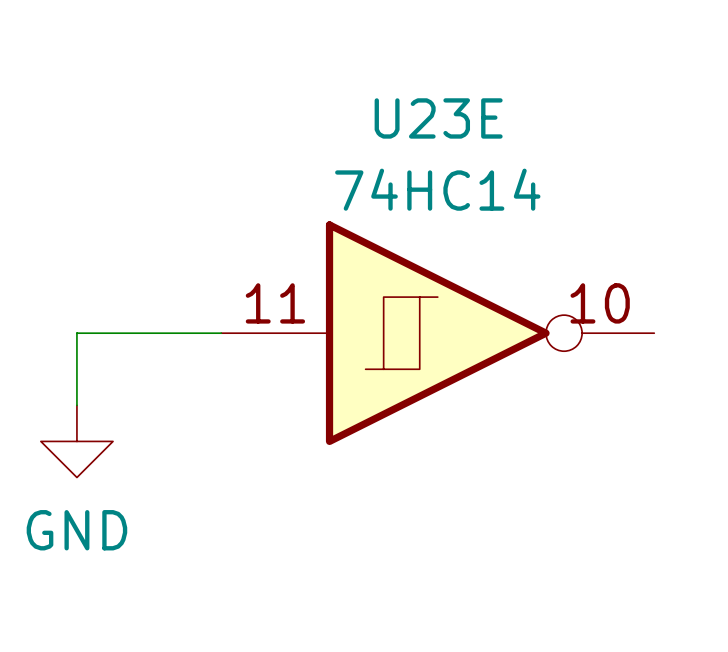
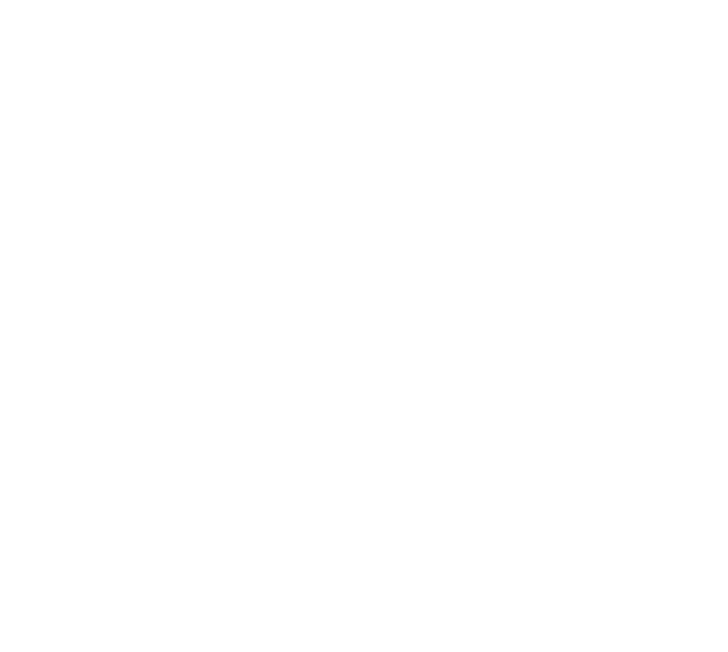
wire: (221, 333) (76, 333) (76, 405) -> none
U23E: 74HC14 (437, 333) -> none
power symbol: GND (76, 441) -> none

